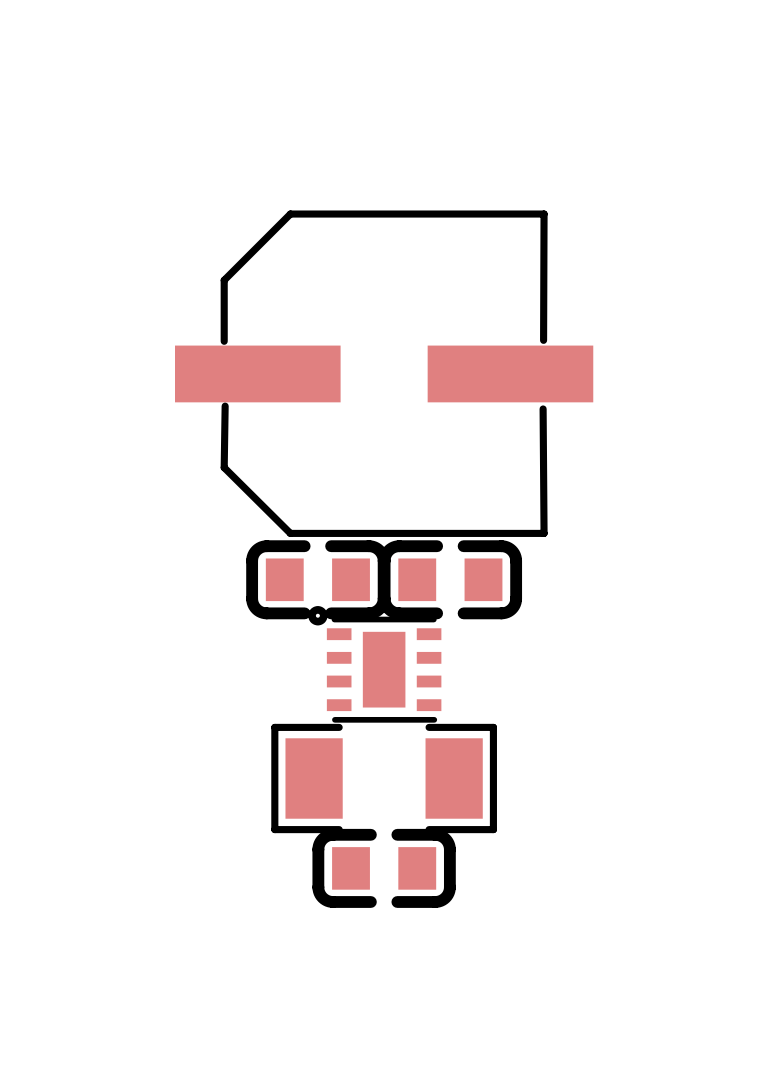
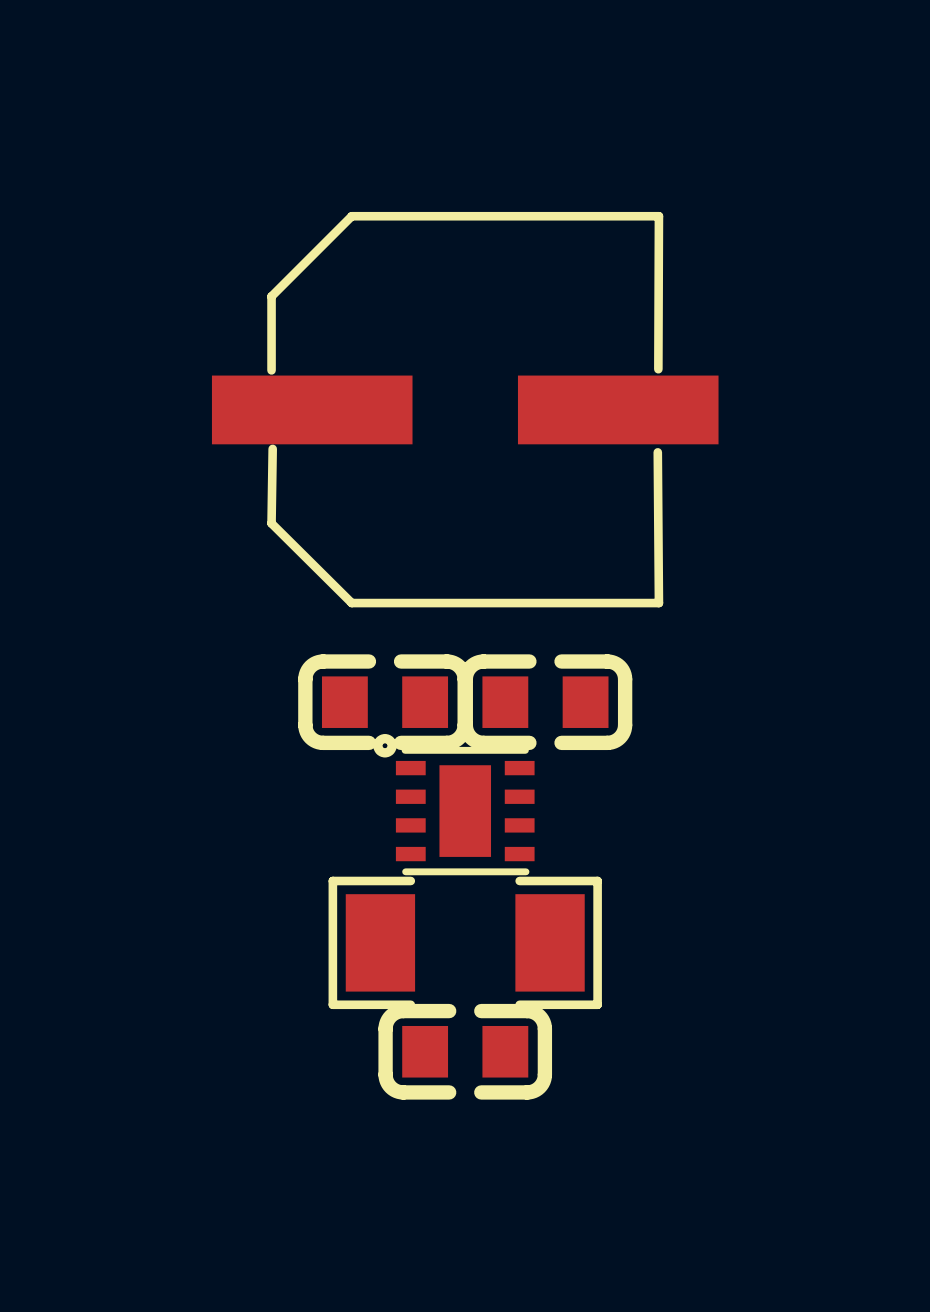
part position: (384, 373) -> (465, 409)

